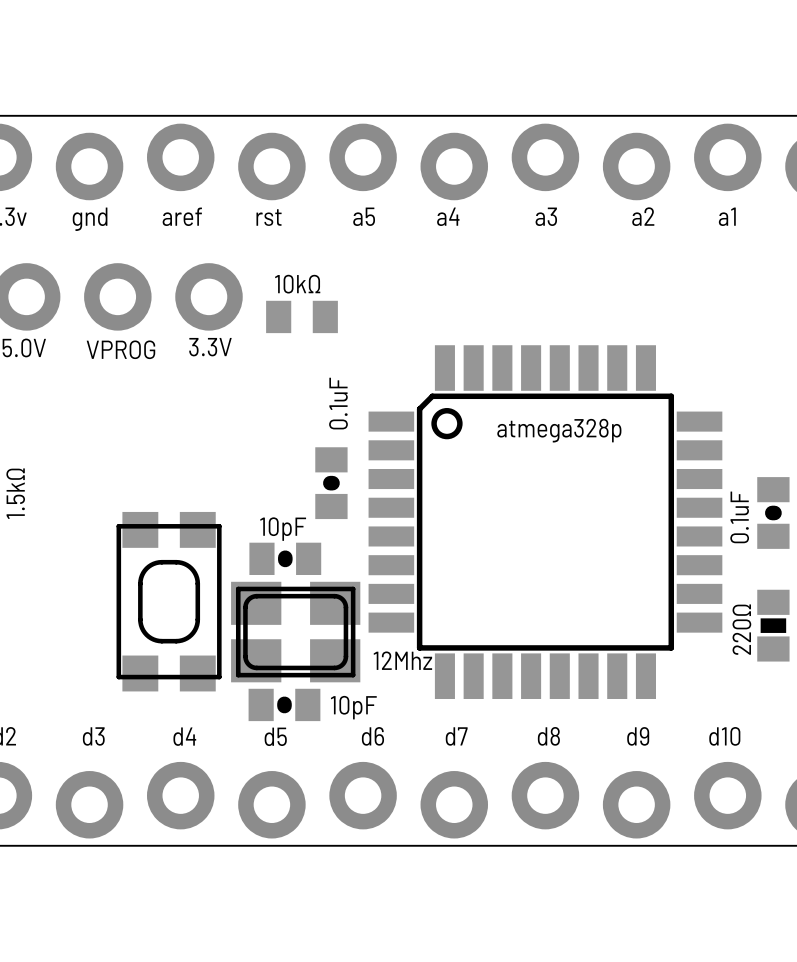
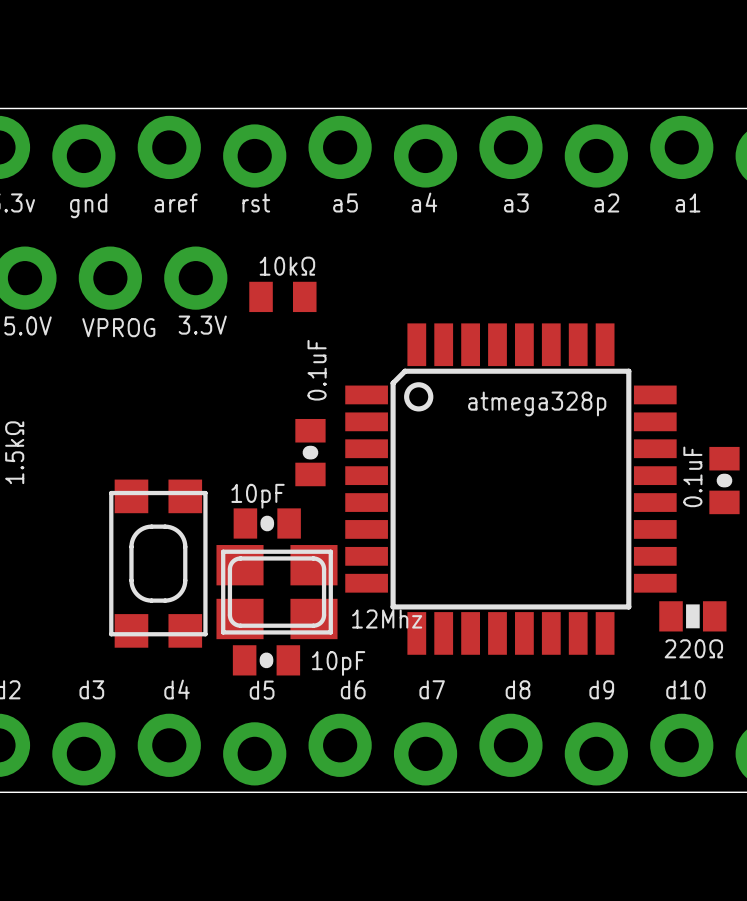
part rotation: 0° (773, 625) -> 90° clockwise (692, 616)
part position: (773, 625) -> (692, 616)
text rotation: 0° (741, 629) -> 90° clockwise (693, 648)

